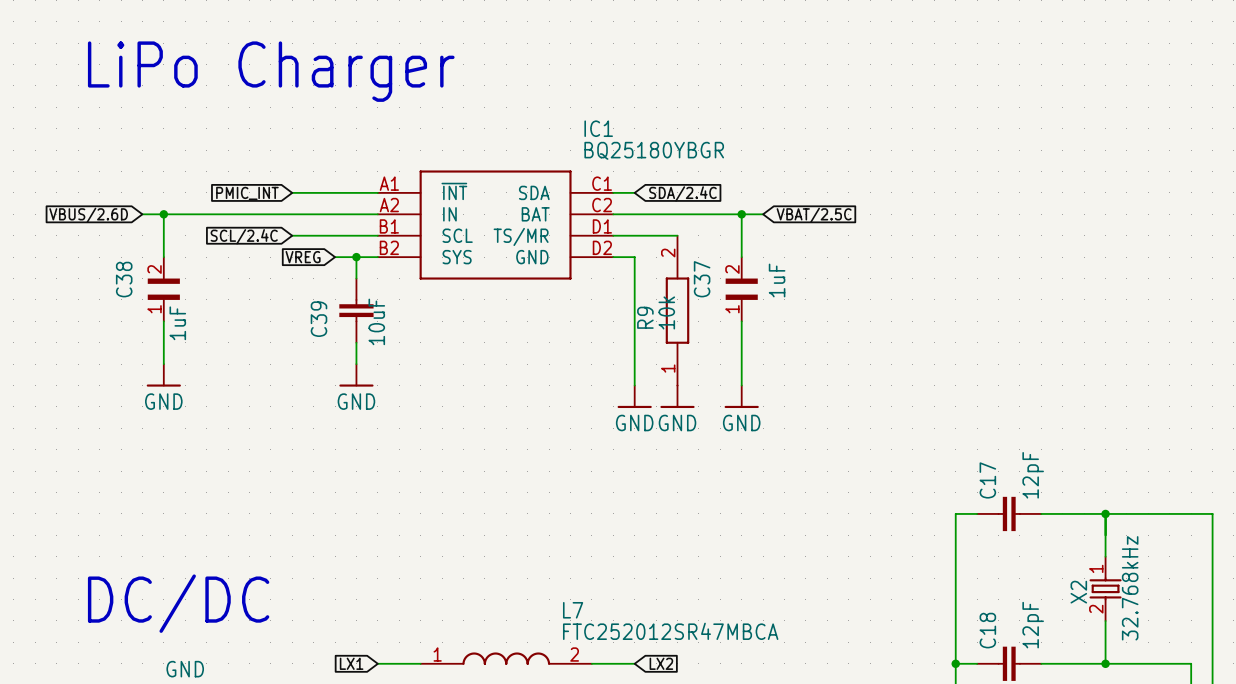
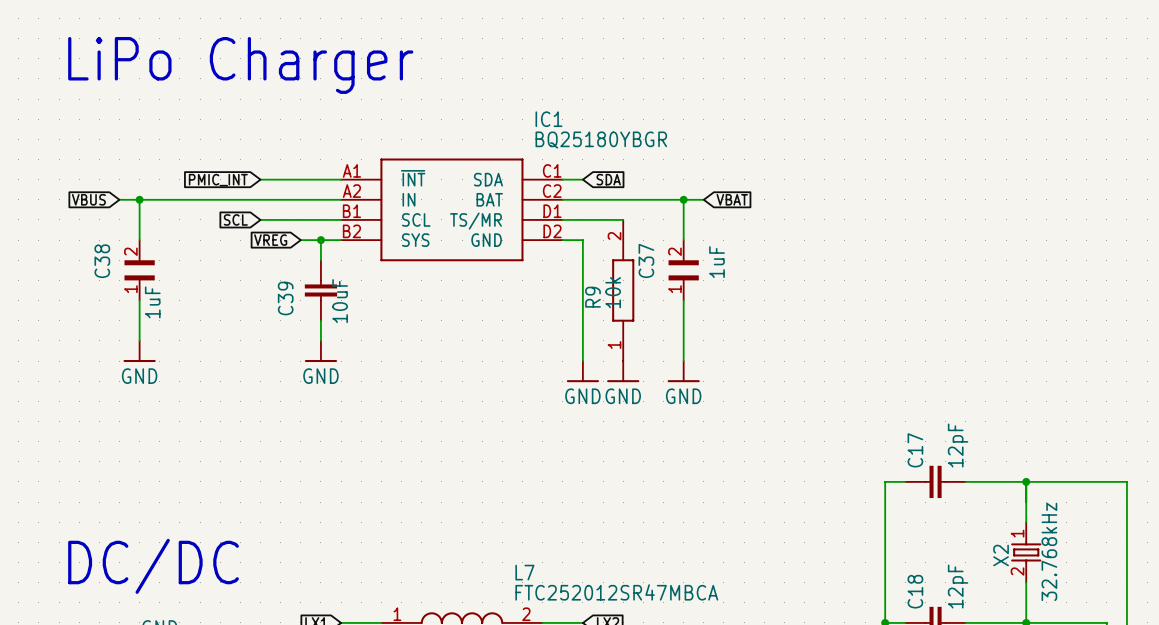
global label: SDA/2.4C (682, 193) -> SDA (608, 179)
global label: VBUS/2.6D (88, 215) -> VBUS (88, 199)
global label: VBAT/2.5C (814, 215) -> VBAT (732, 199)
global label: SCL/2.4C (244, 236) -> SCL (235, 219)

